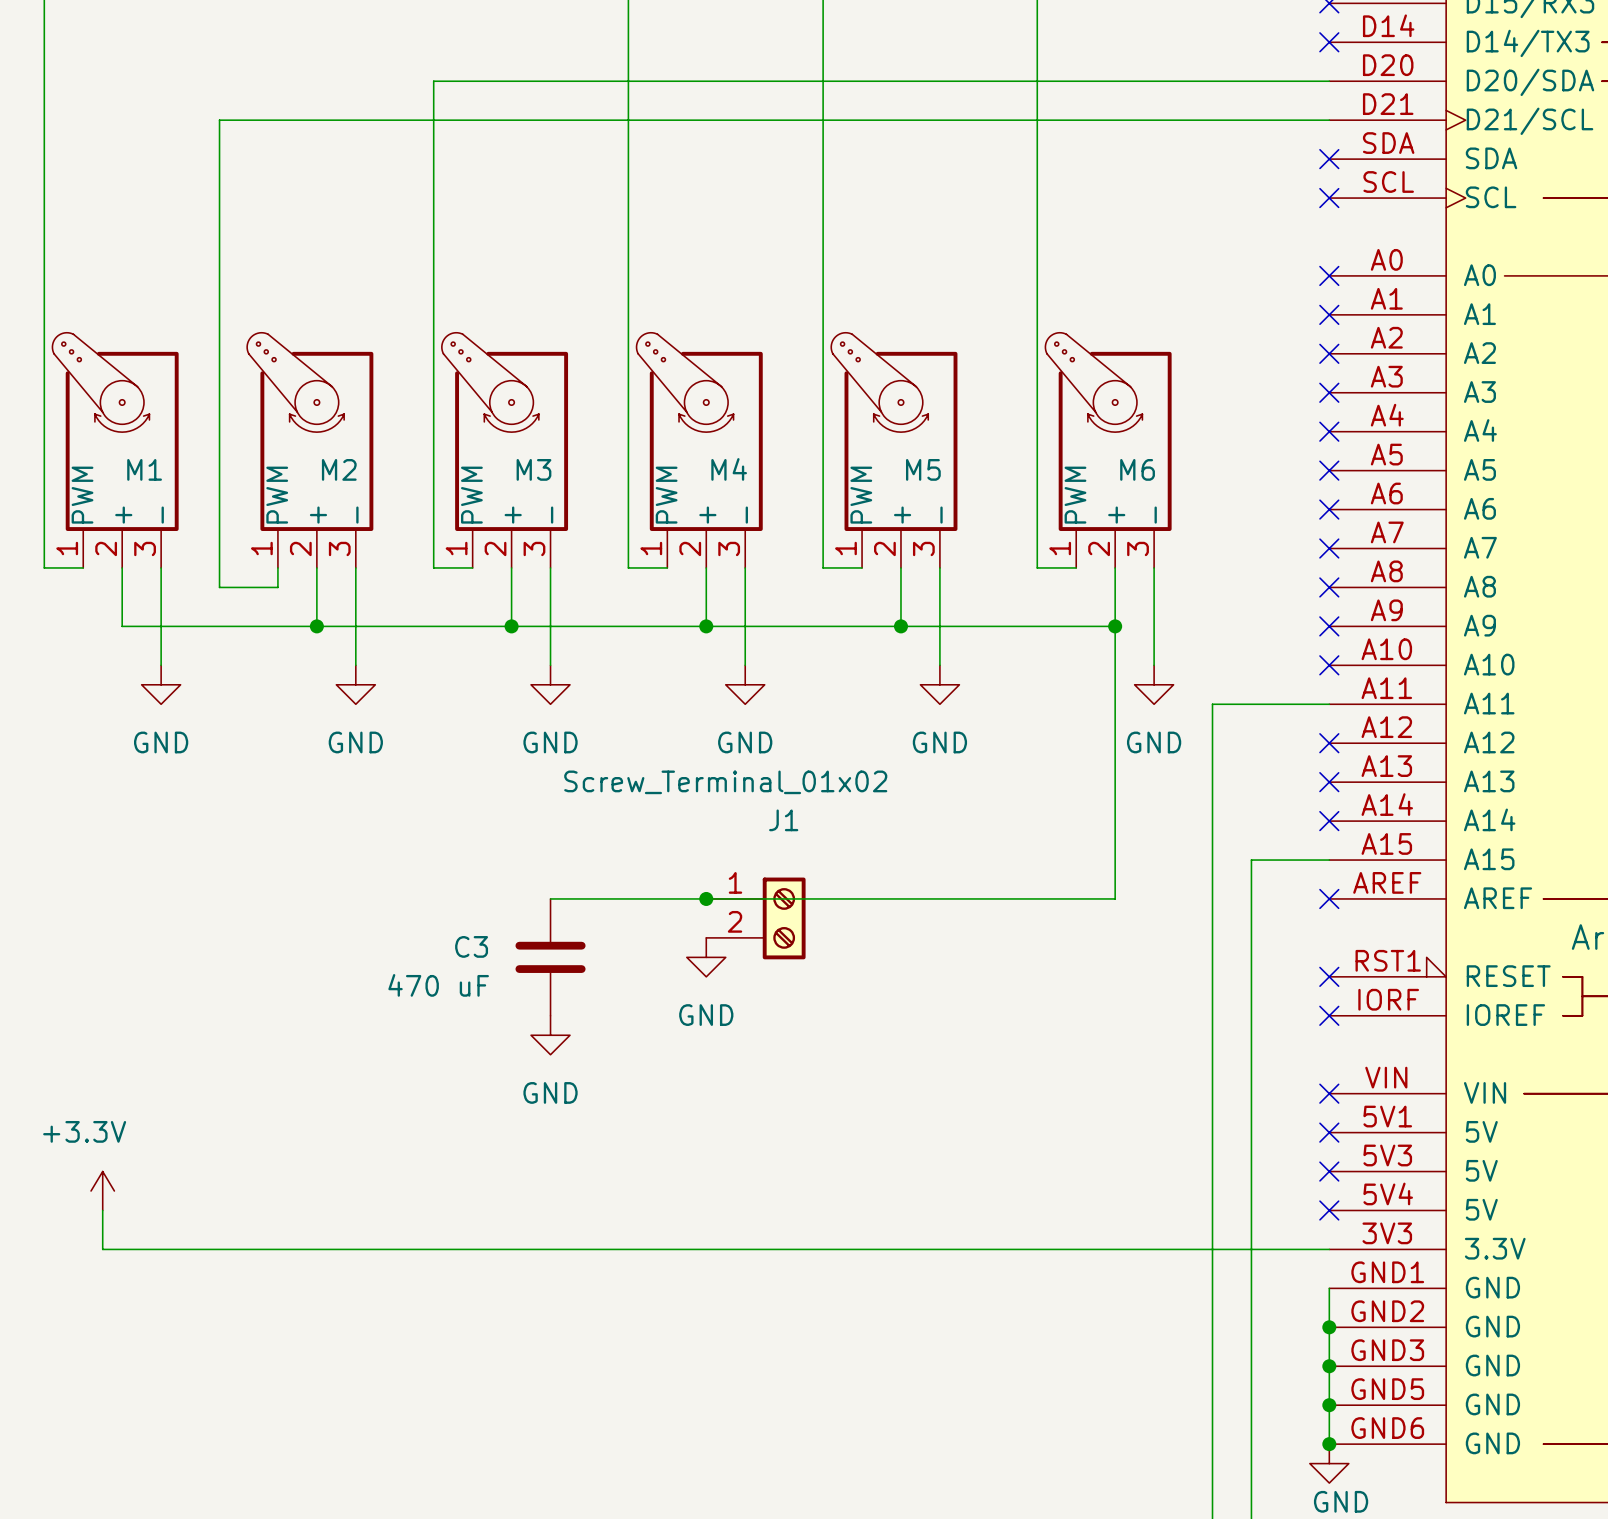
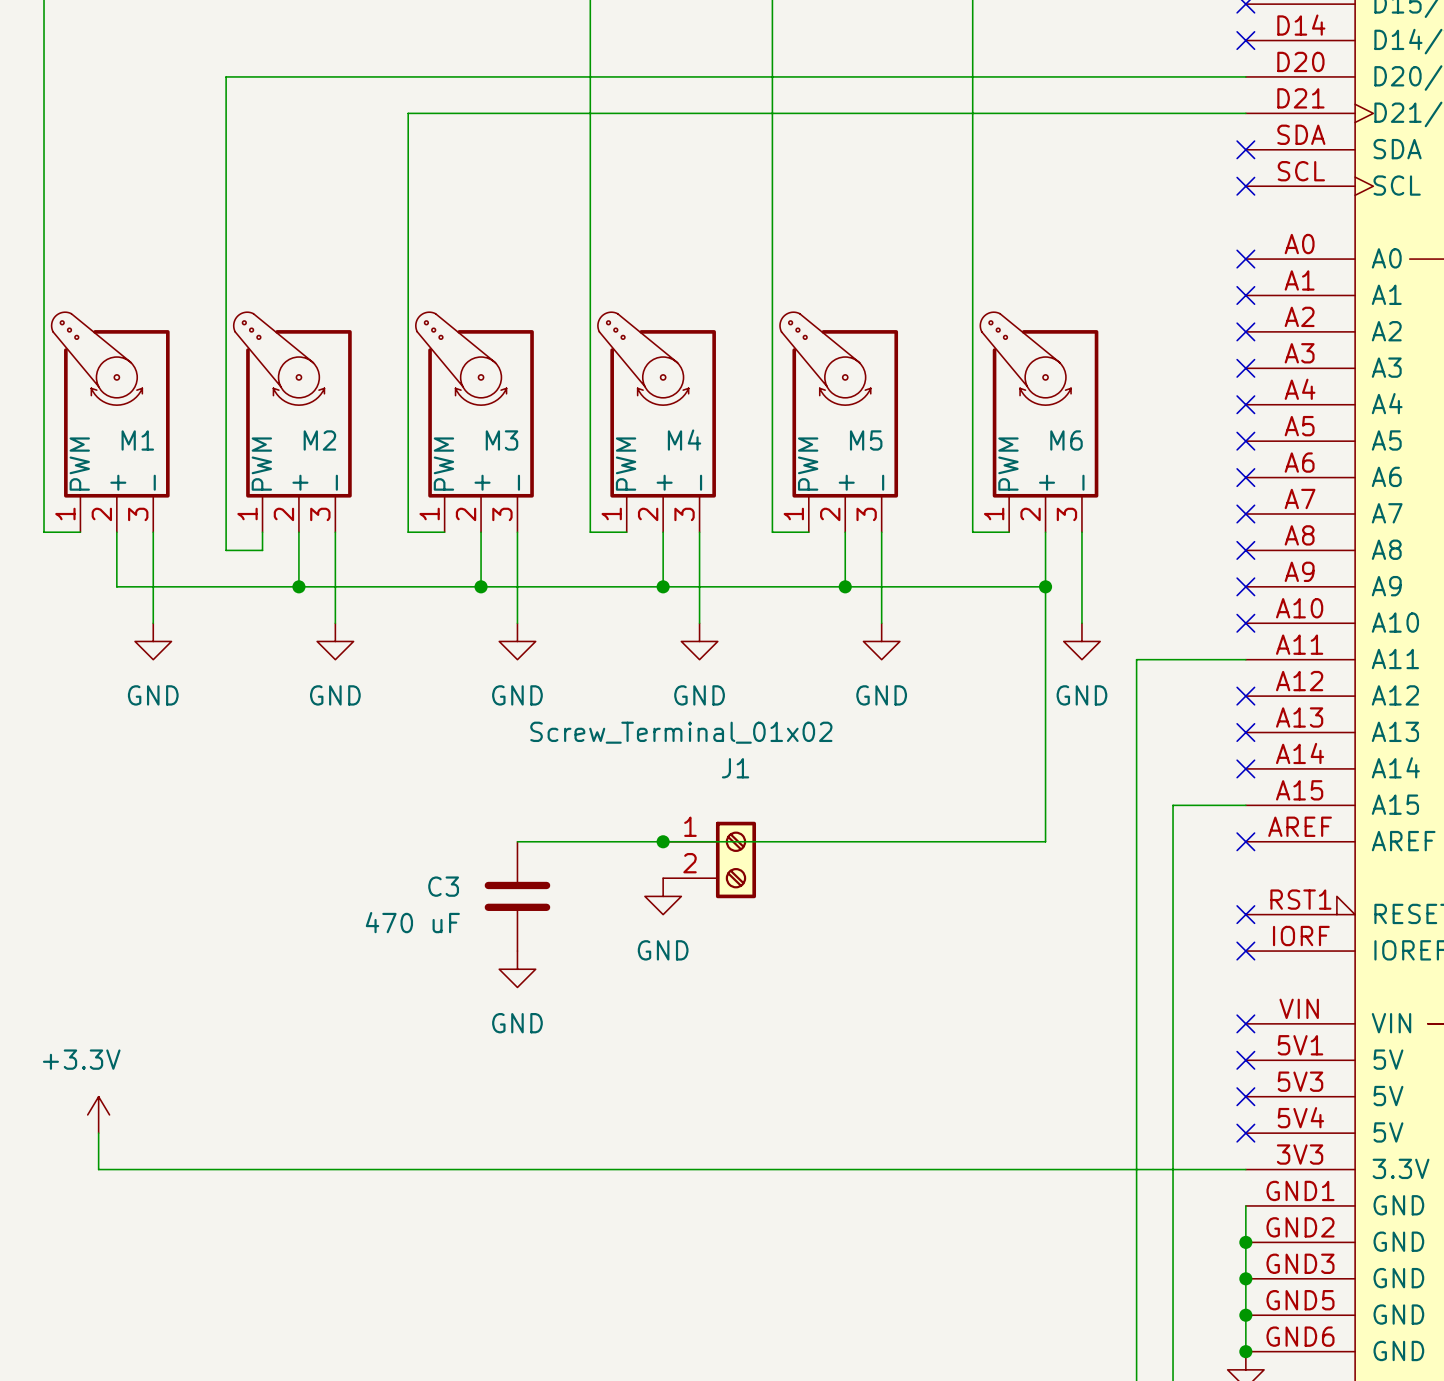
wire: (433, 81) (433, 120) (219, 120) (219, 587) (239, 587) -> (408, 76) (226, 76) (226, 550)

